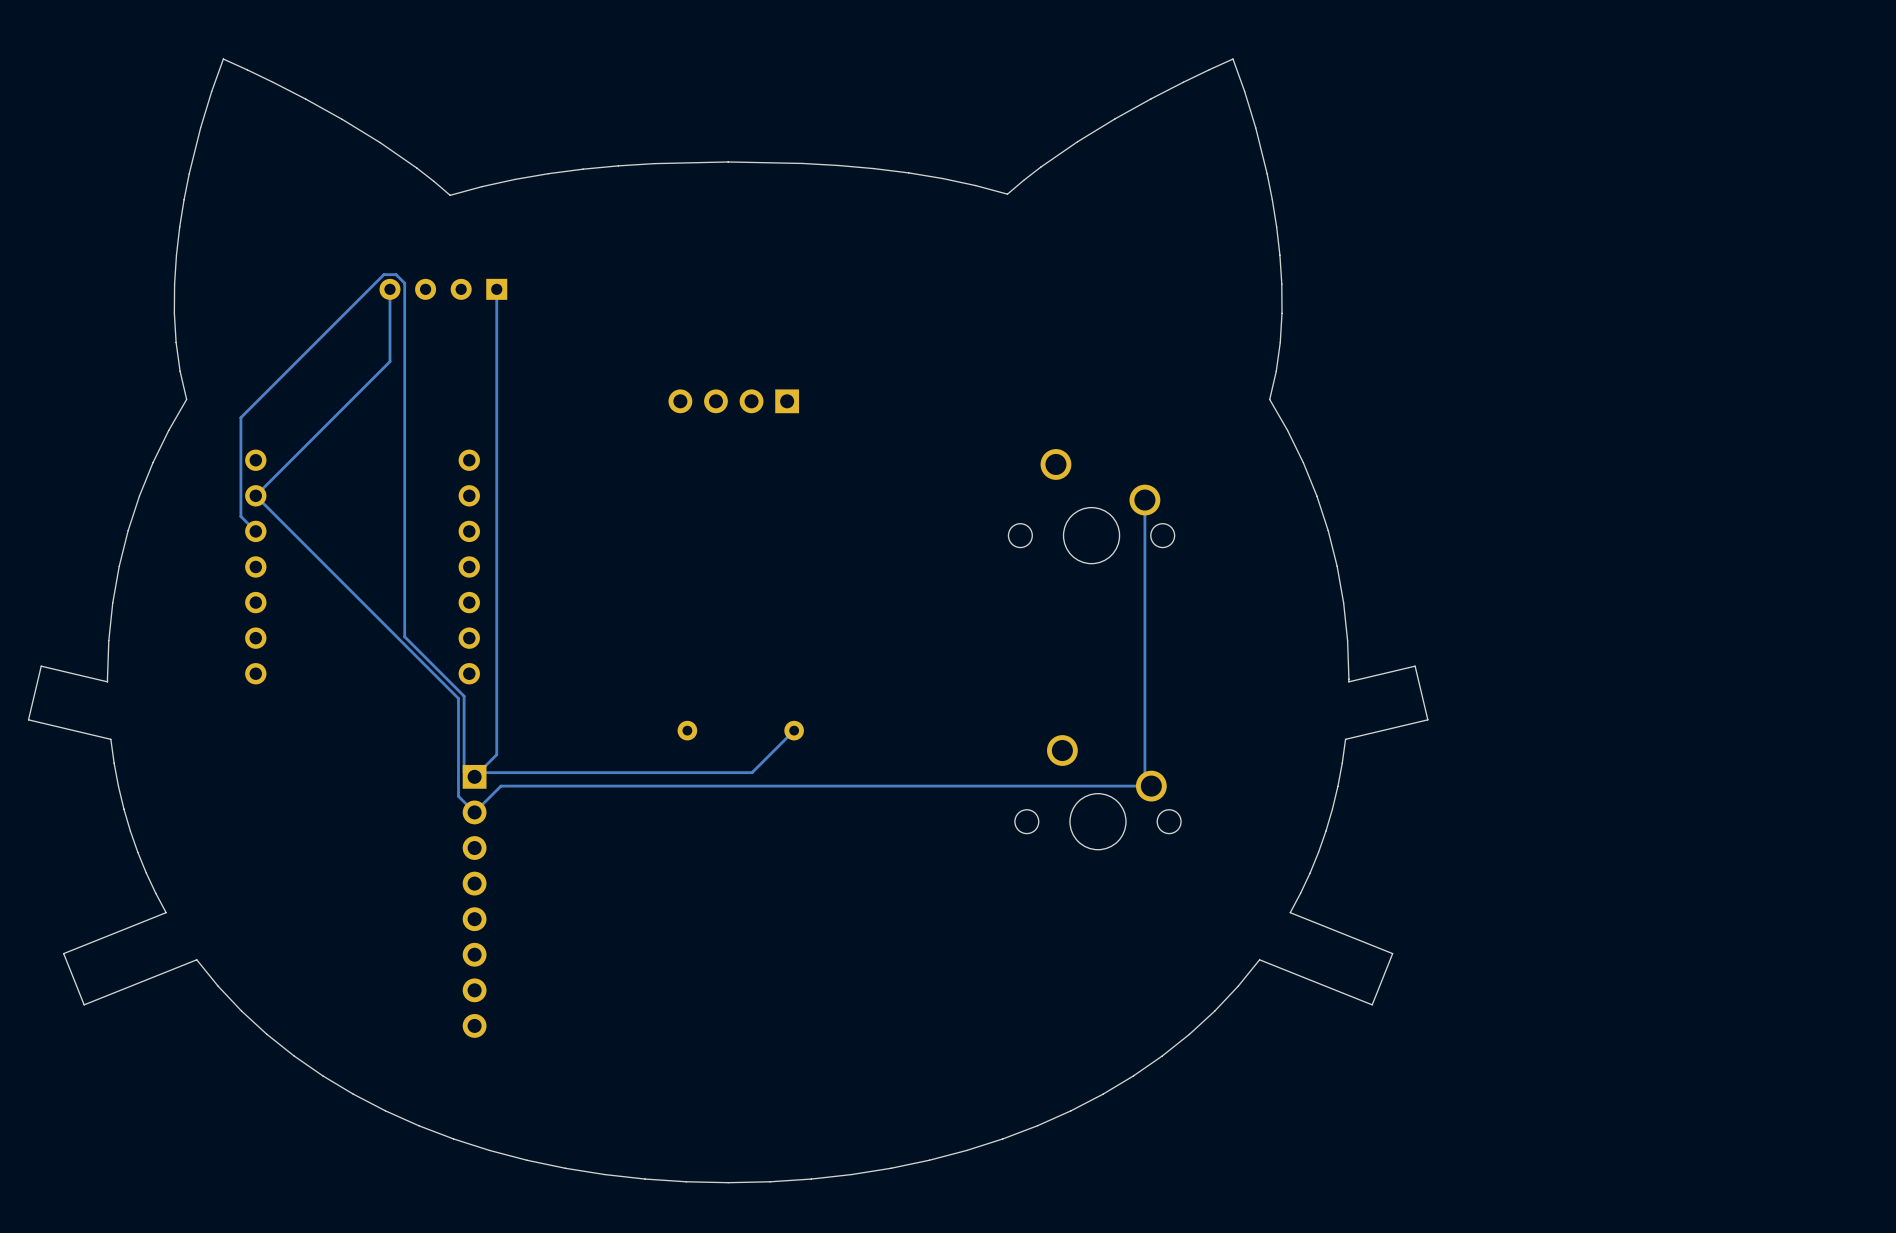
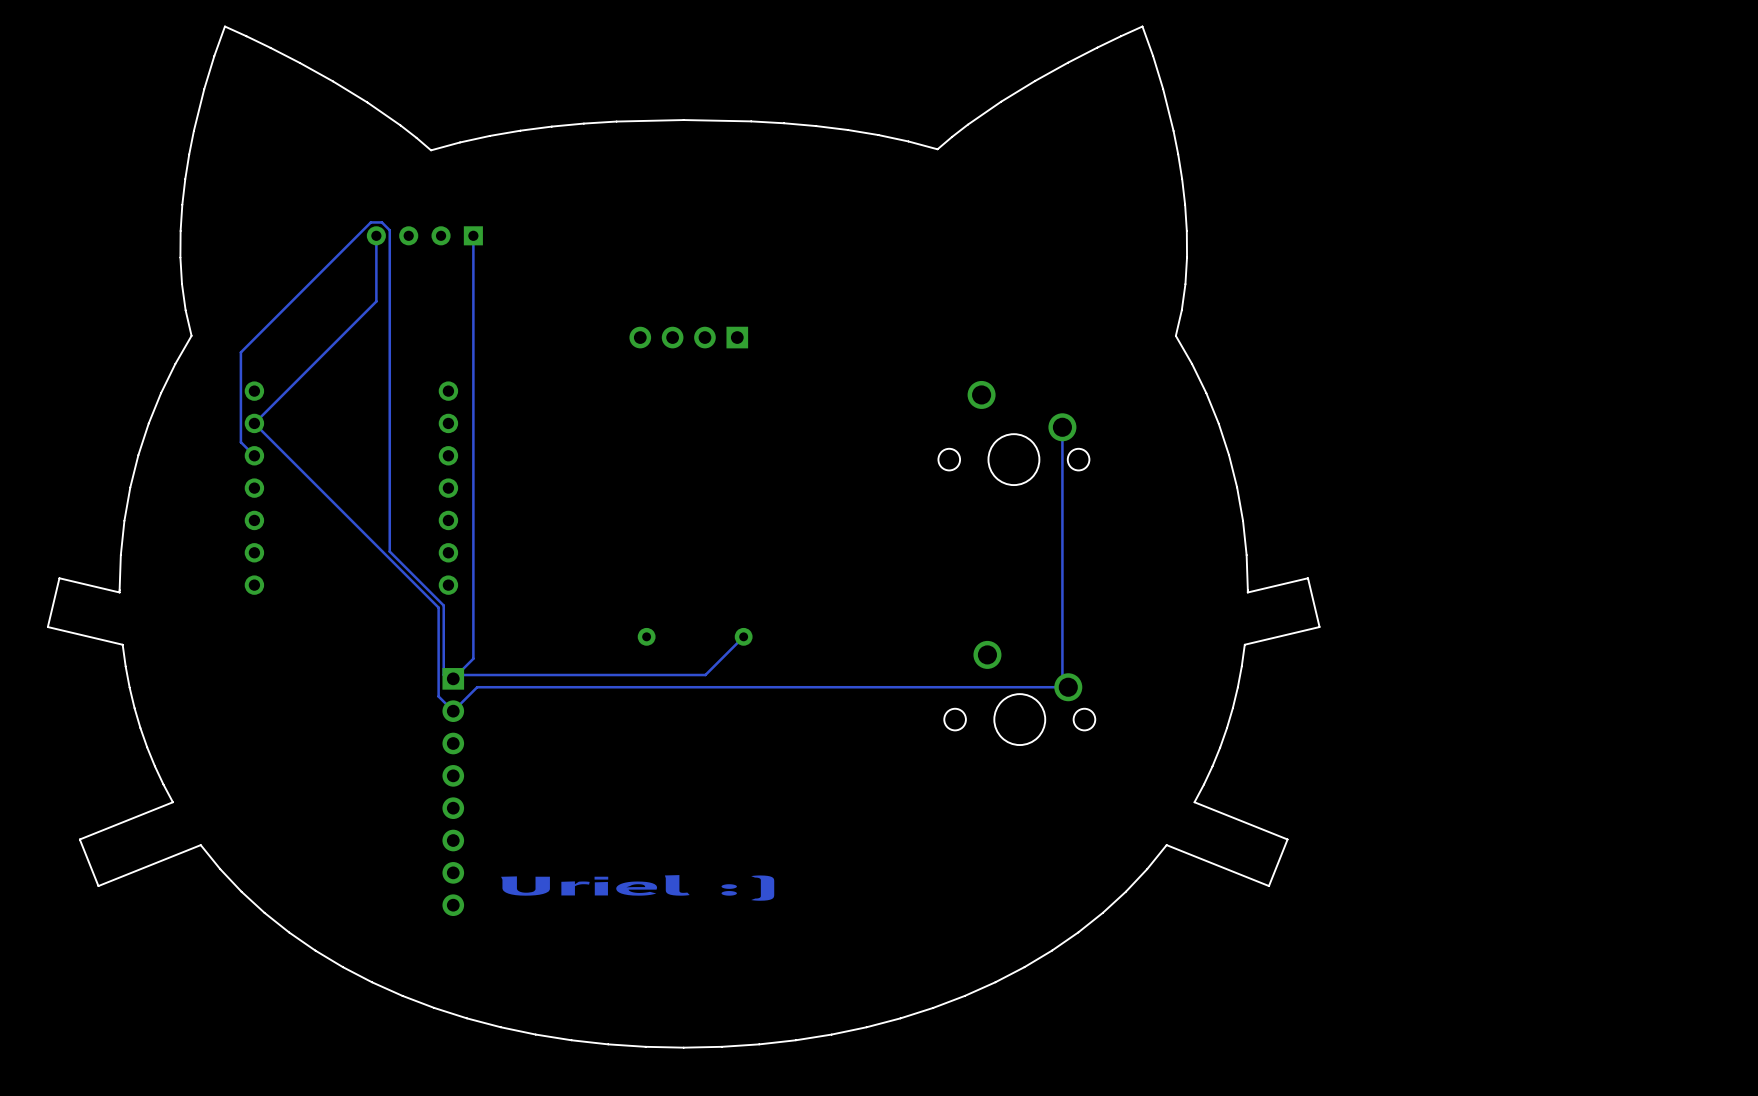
text: none -> Uriel :) (637, 887)

